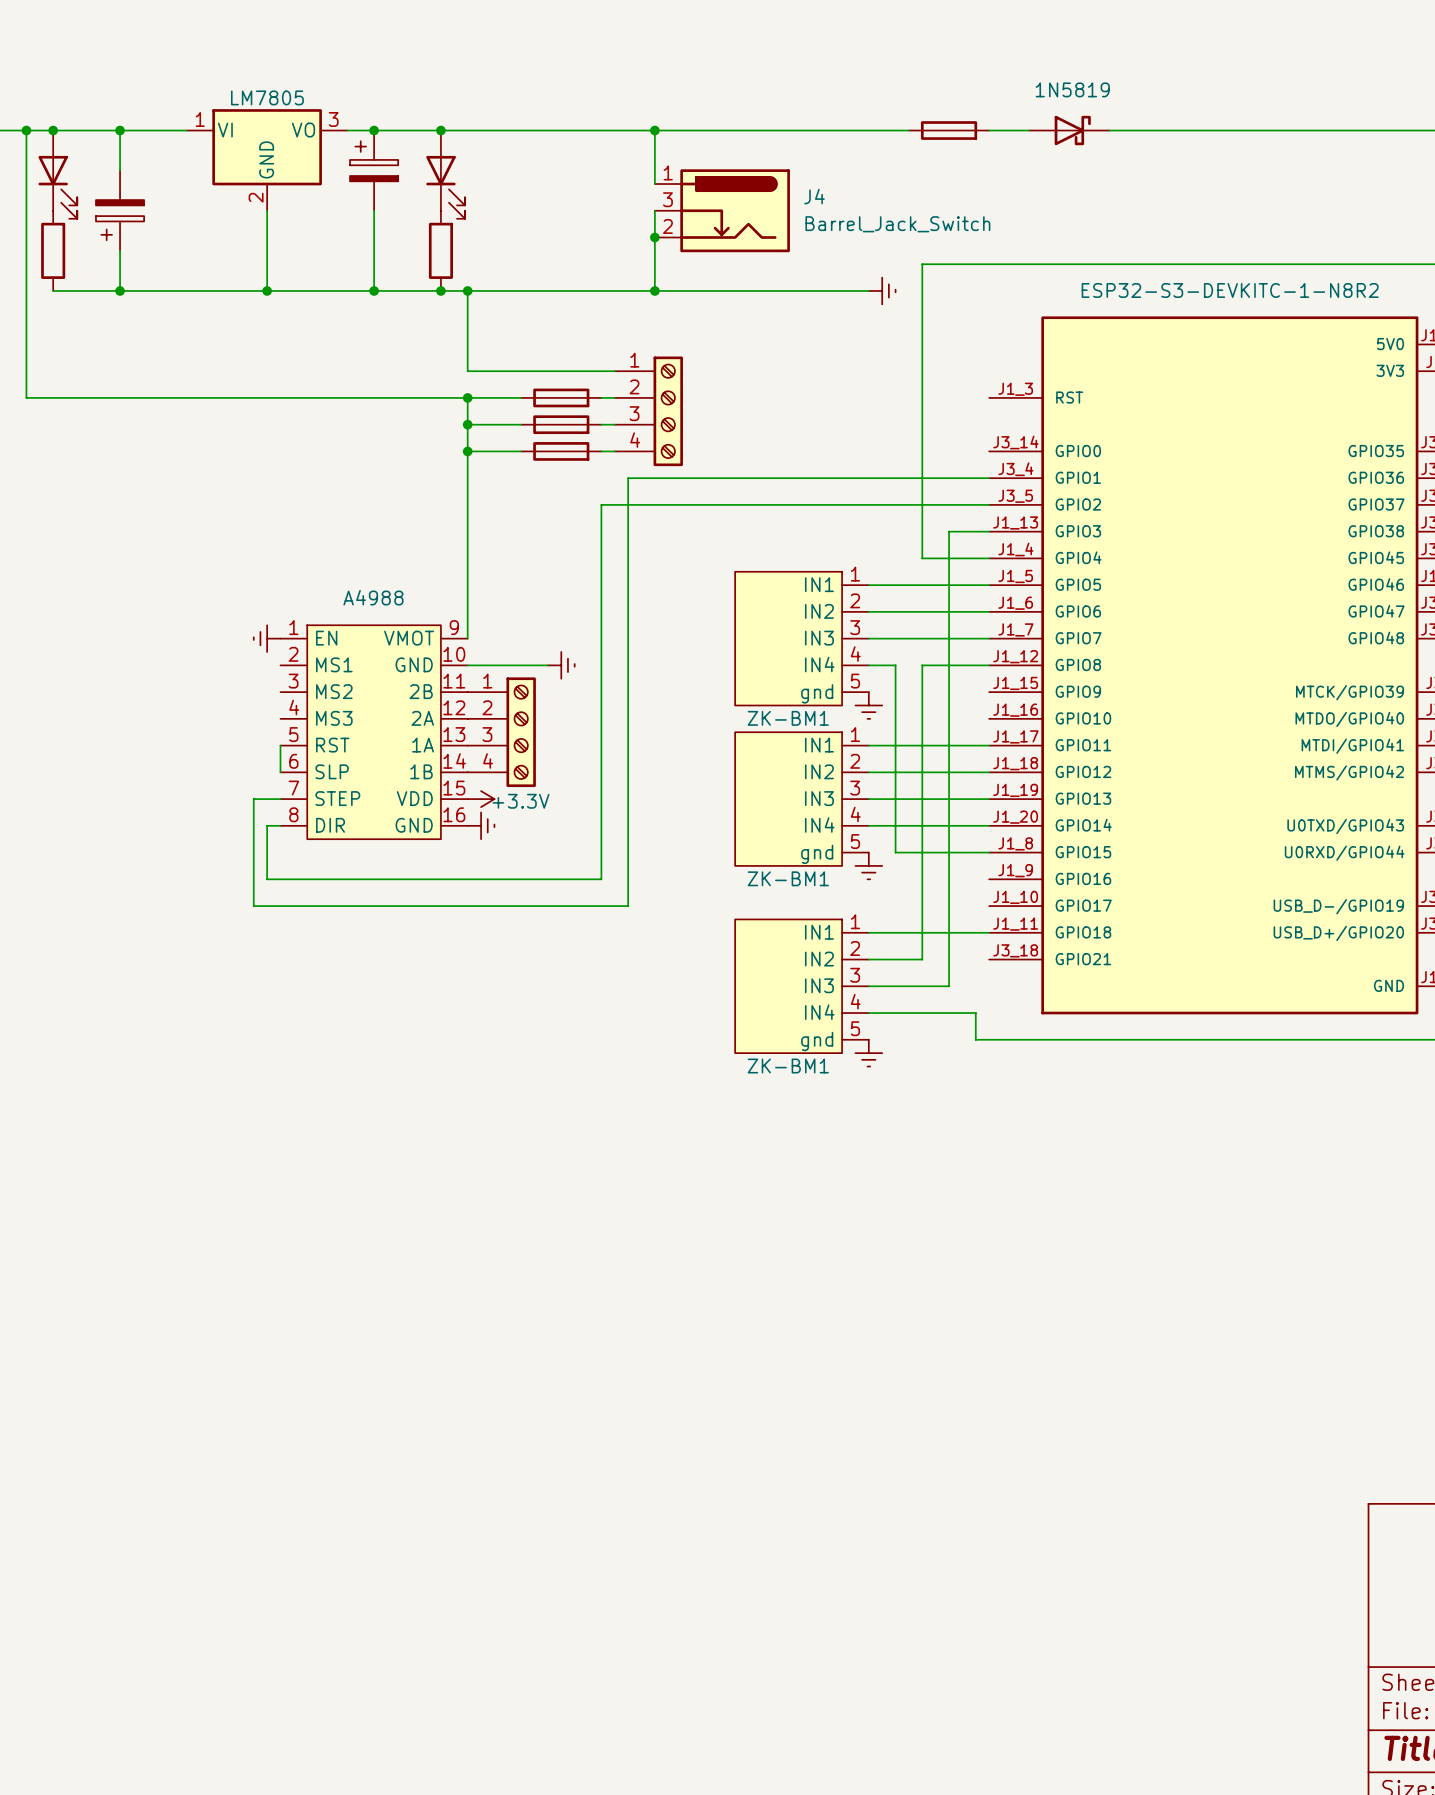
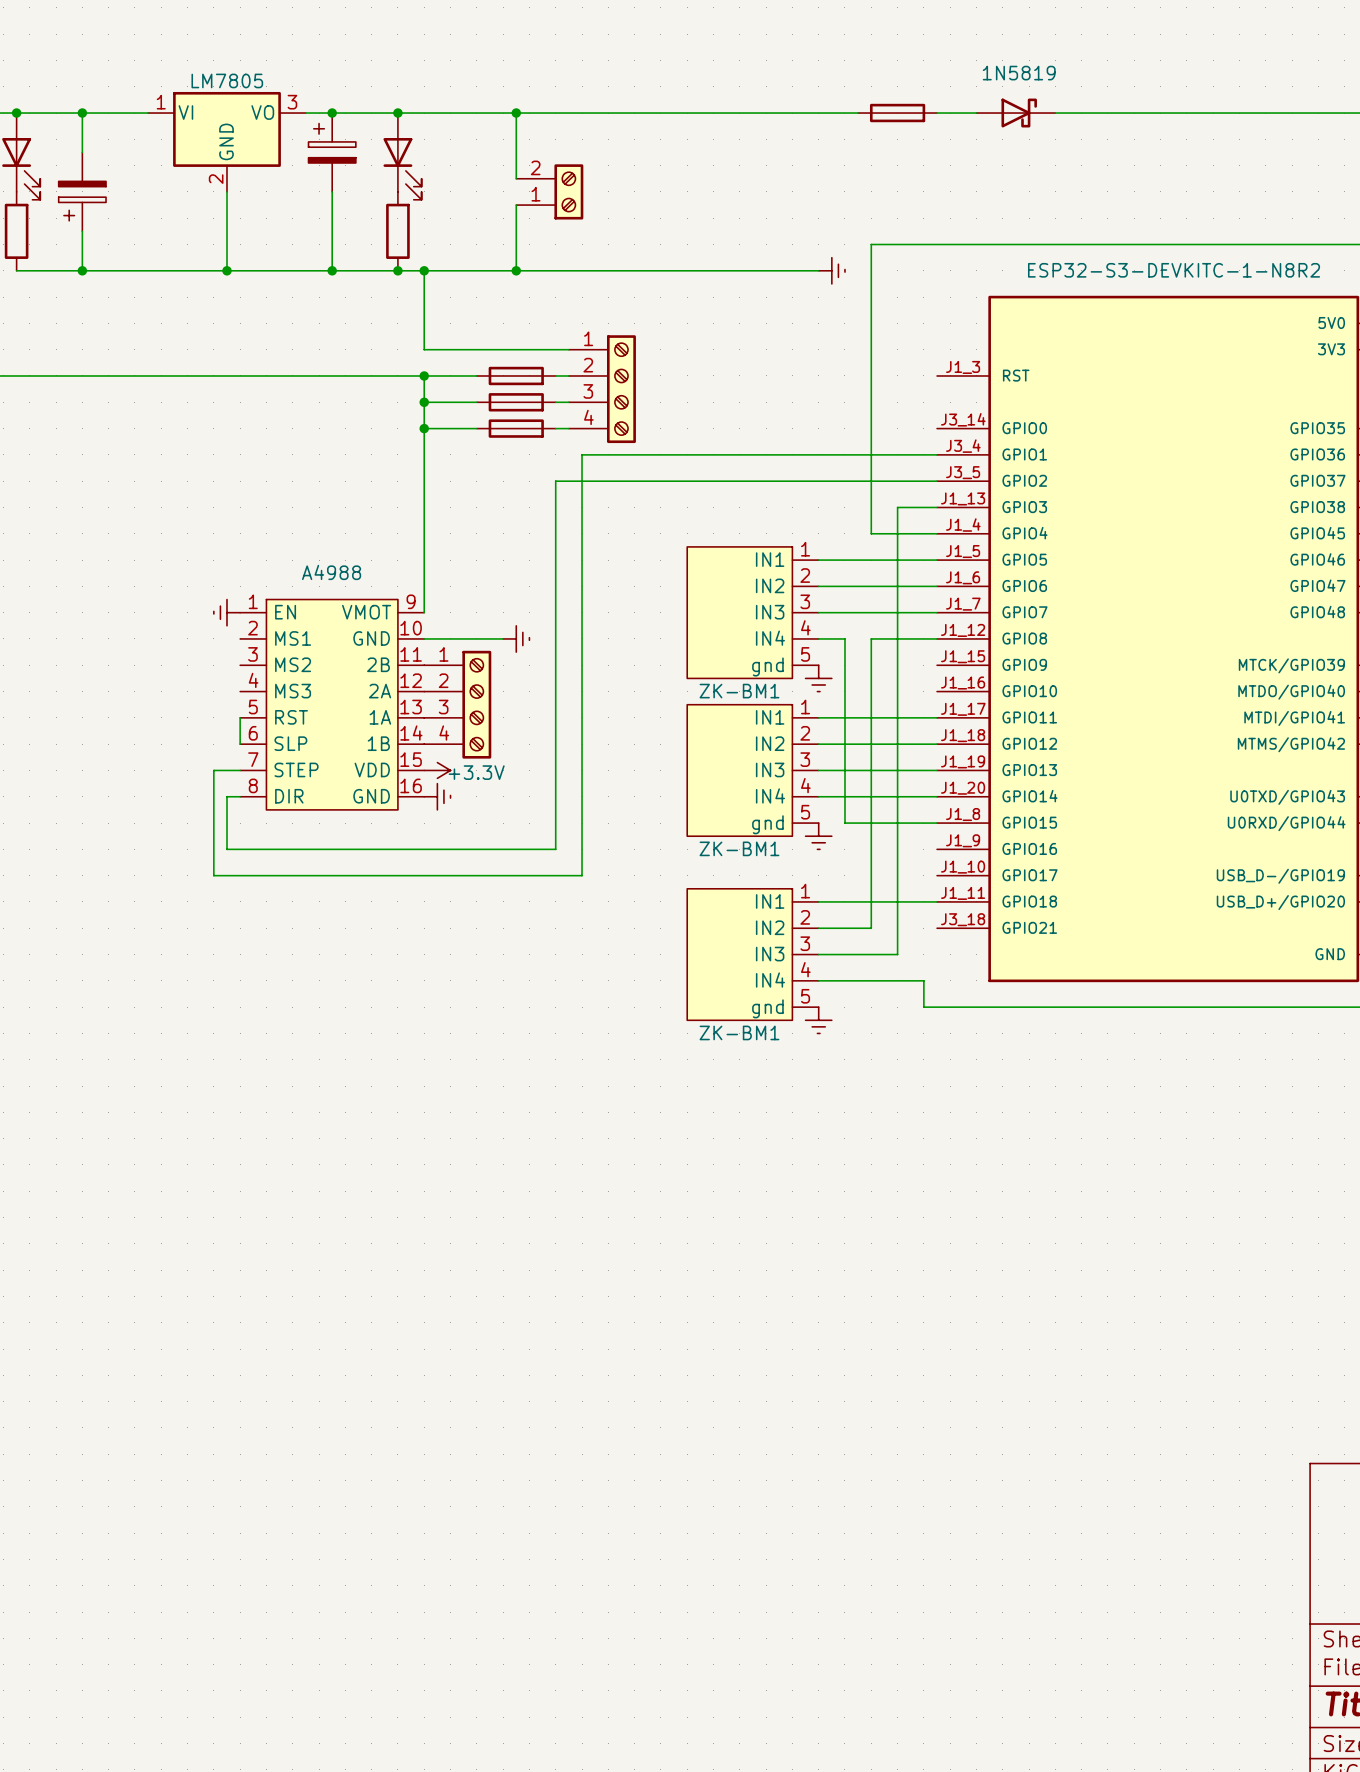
wire: none -> (516, 113) (516, 178)
junction: none -> (516, 113)
wire: (654, 130) (654, 184) -> none
junction: (654, 130) -> none
part: none -> (549, 191)
wire: (654, 210) (654, 290) -> none
J4: Barrel_Jack_Switch (722, 210) -> none
wire: none -> (516, 205) (516, 270)
junction: (654, 237) -> none
junction: none -> (516, 270)
junction: (654, 290) -> none

